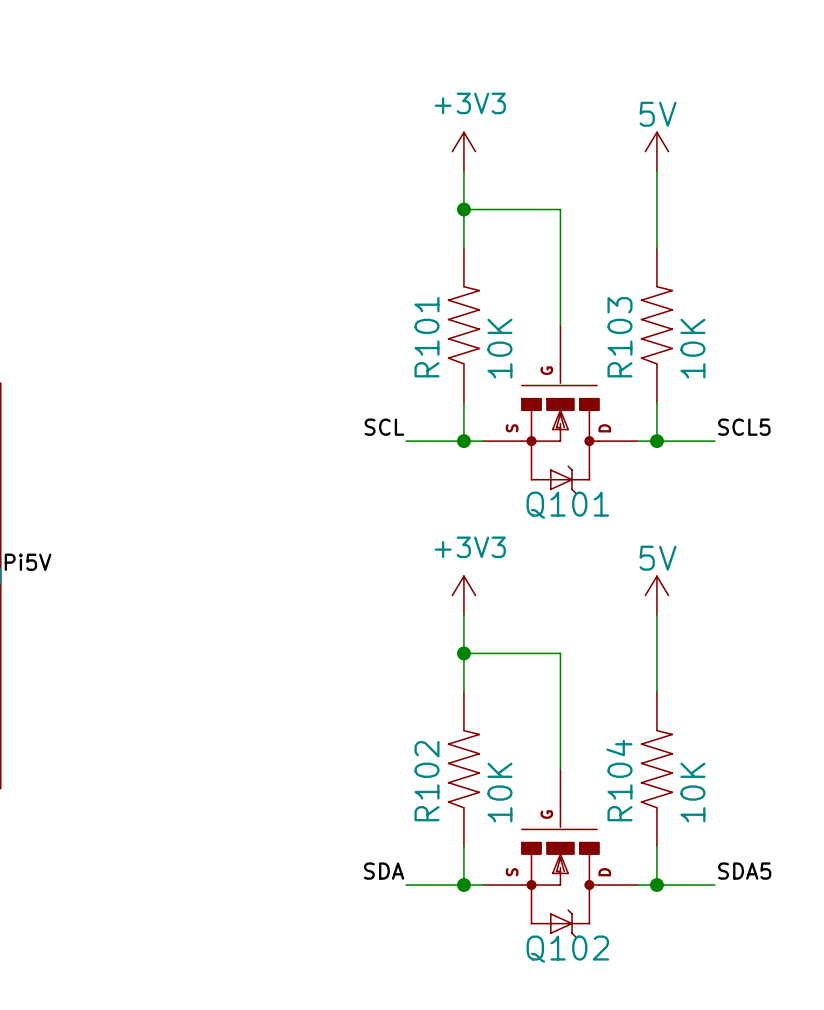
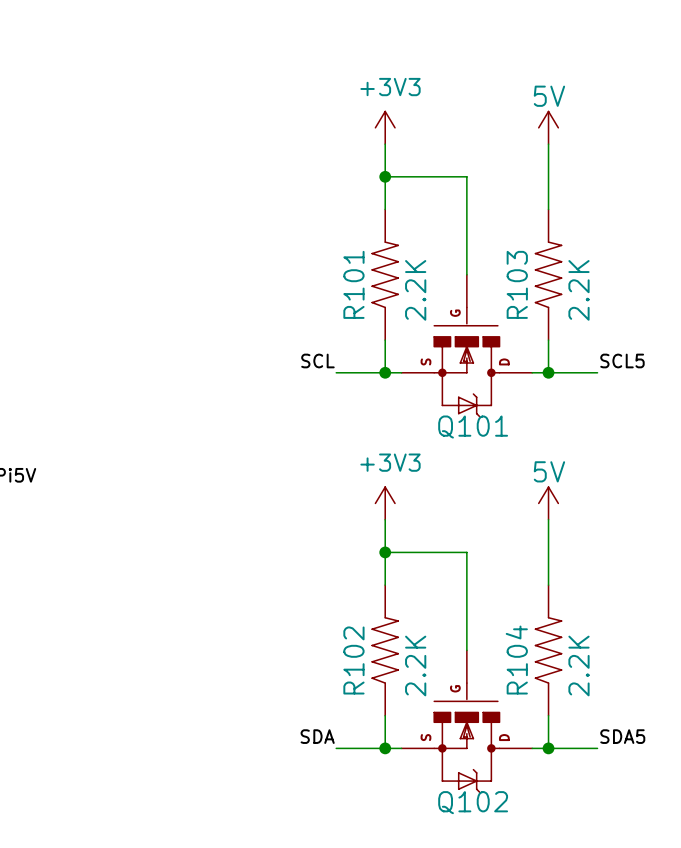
R101 value: 10K (499, 348) -> 2.2K (415, 290)
R103 value: 10K (692, 348) -> 2.2K (578, 290)
R102 value: 10K (499, 792) -> 2.2K (415, 666)
R104 value: 10K (692, 792) -> 2.2K (578, 666)

